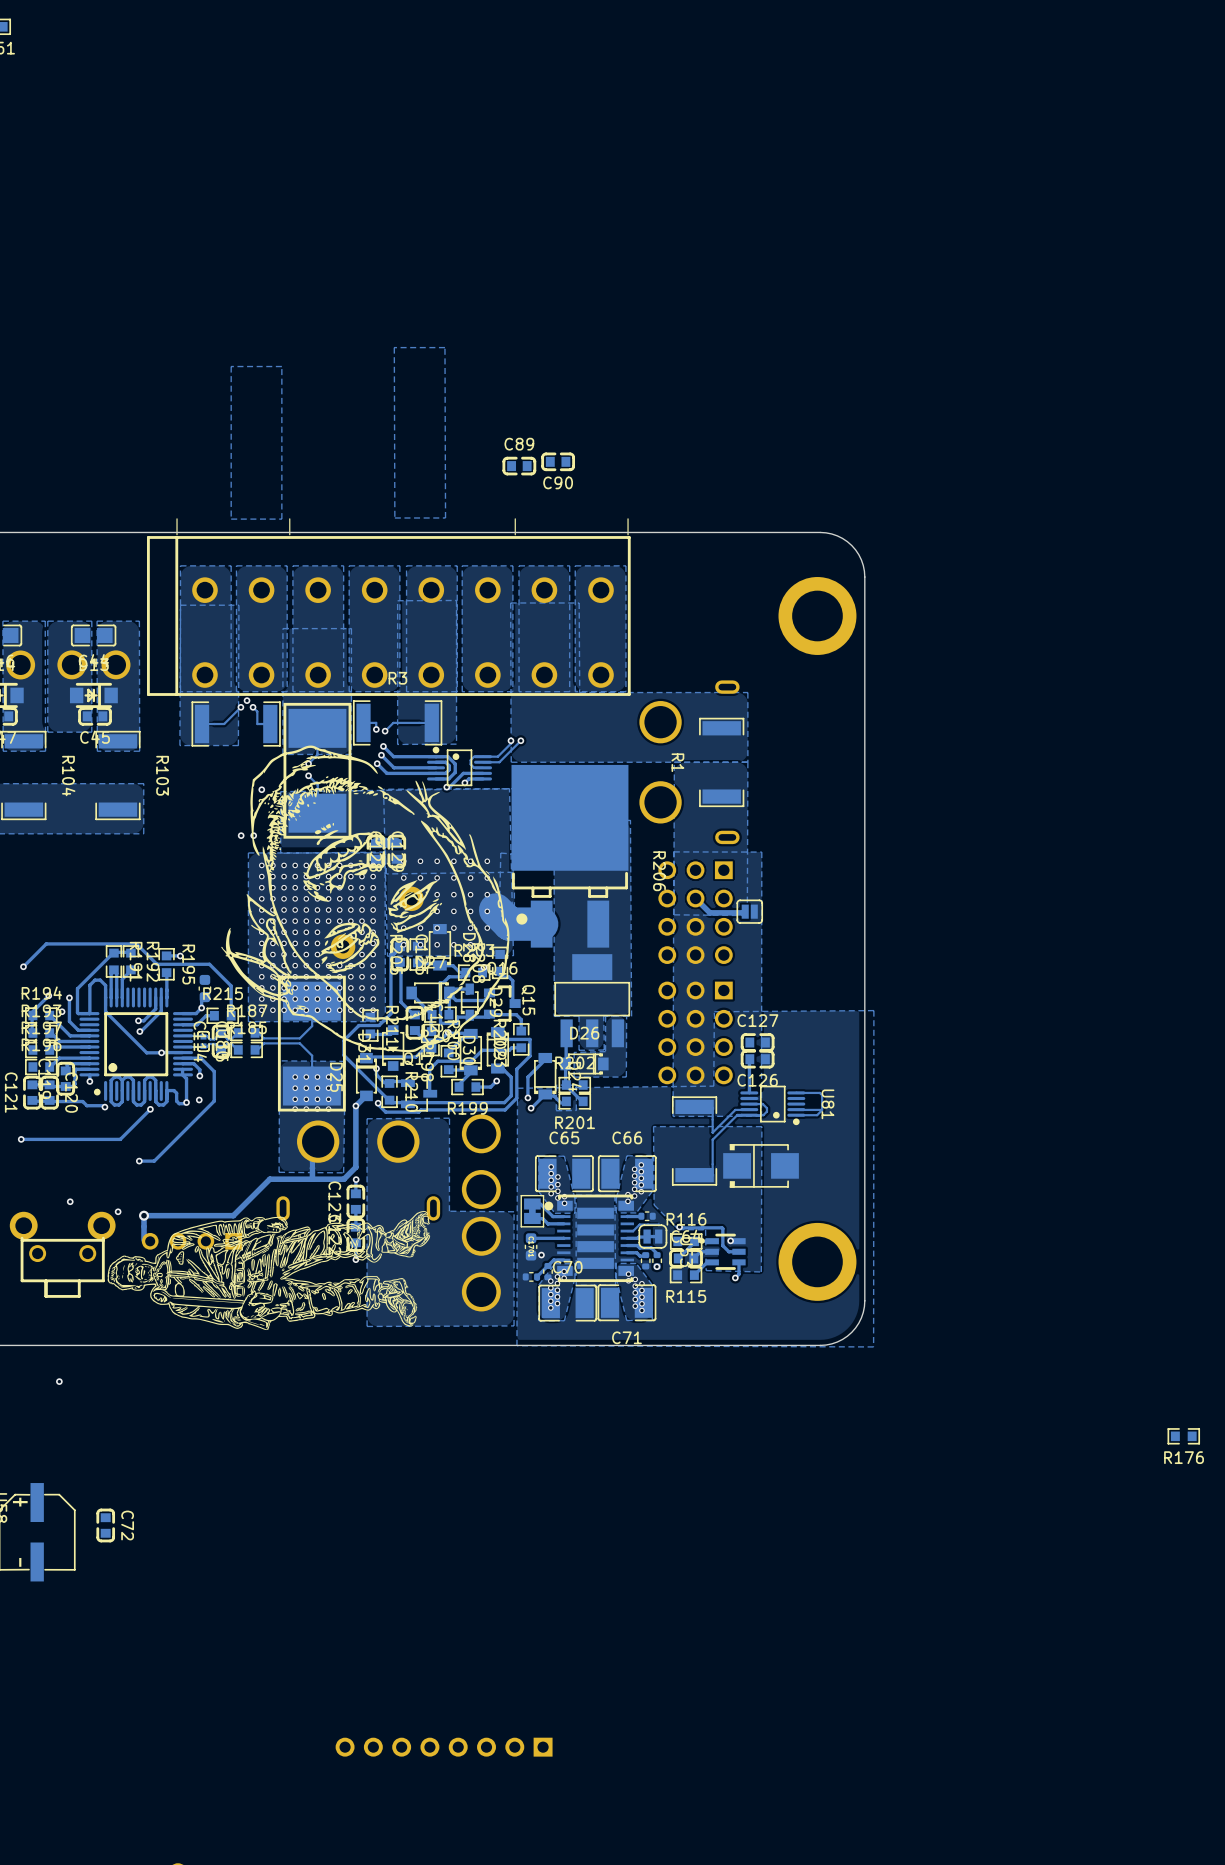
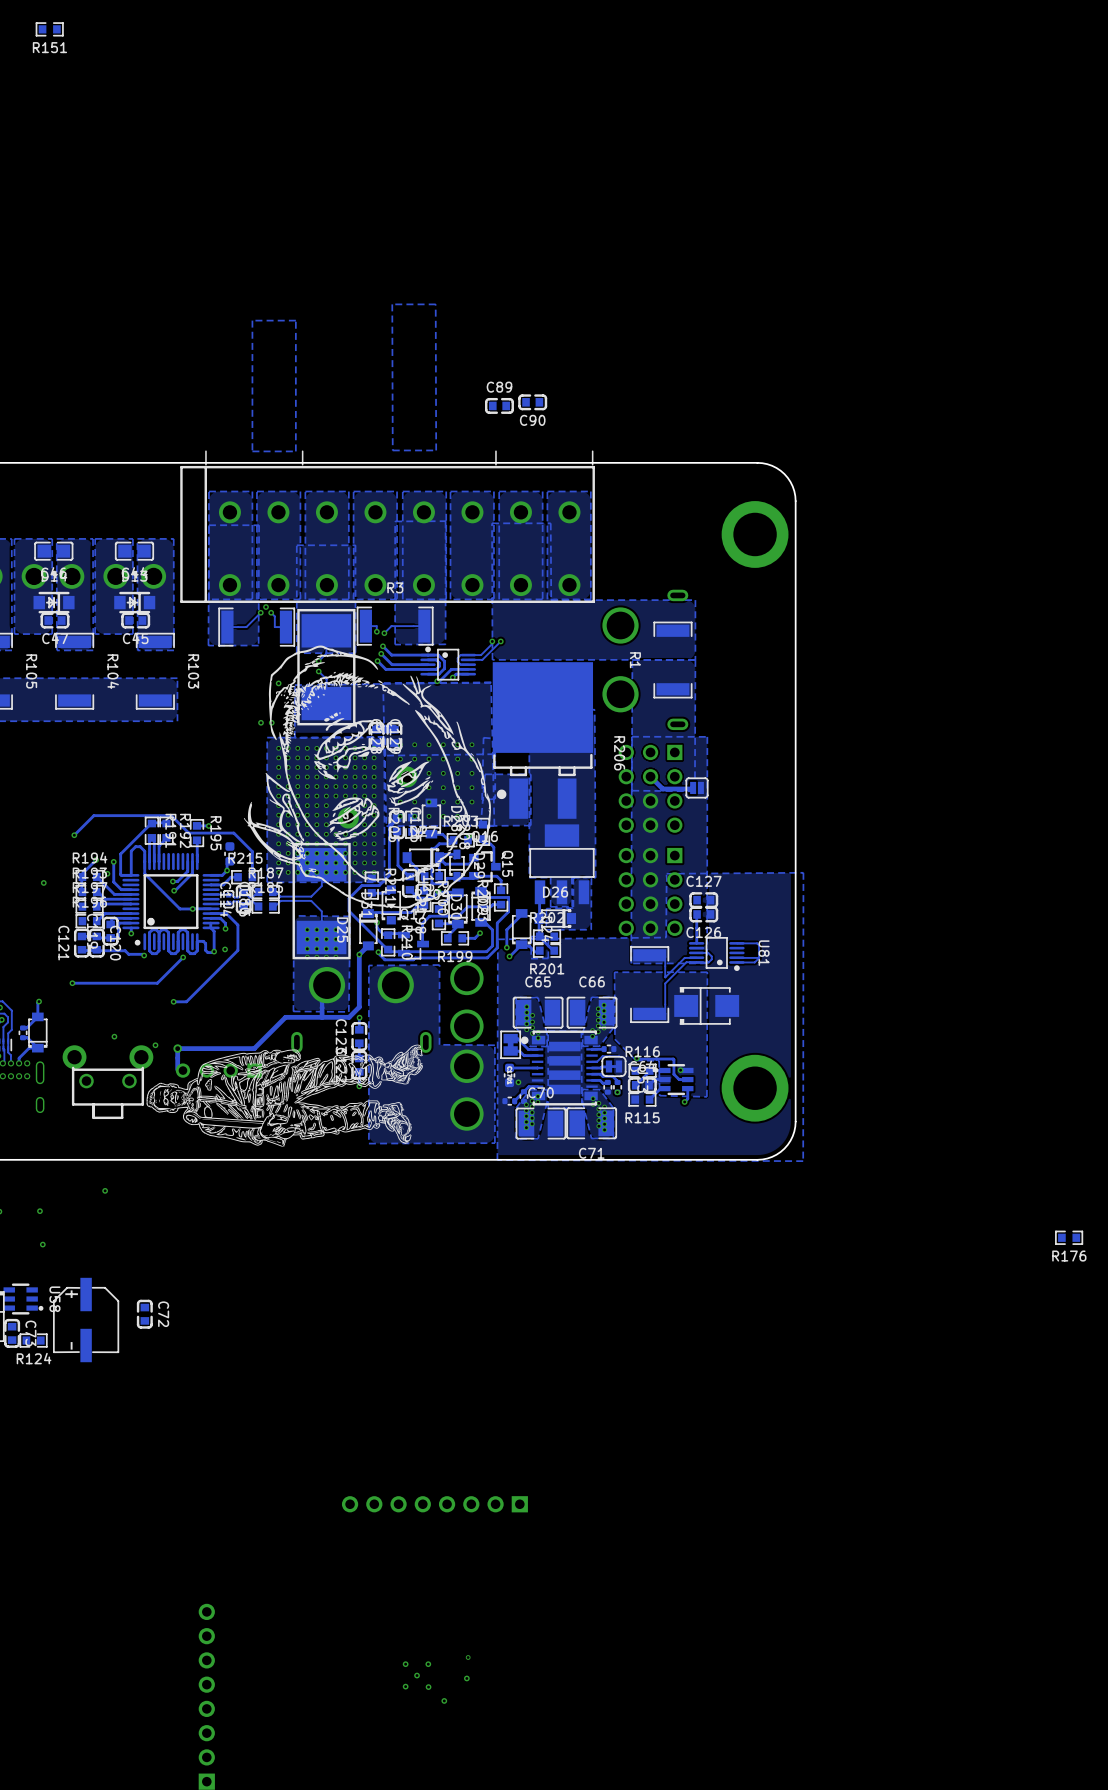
zone outline: none -> (530, 774) (485, 774) (480, 826) (530, 825) (530, 774)
track: (495, 909) (509, 924) (541, 924) -> none

